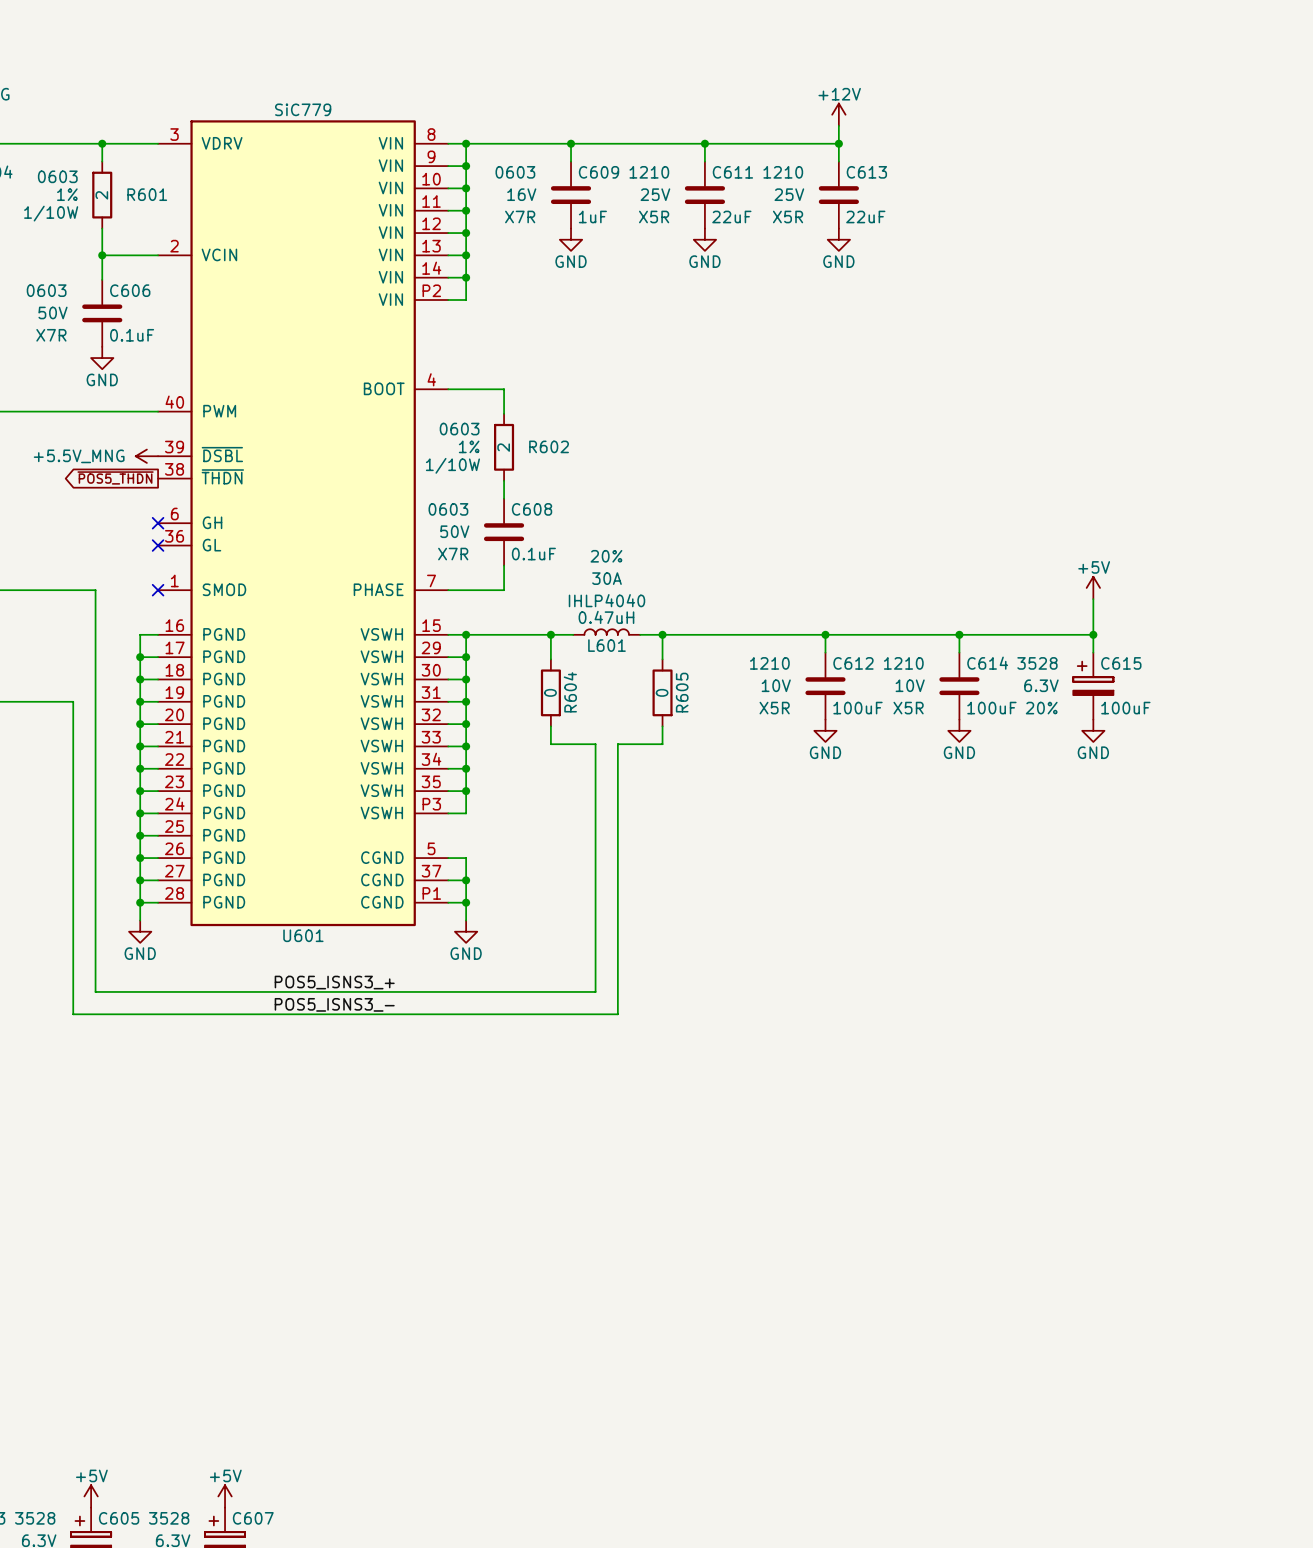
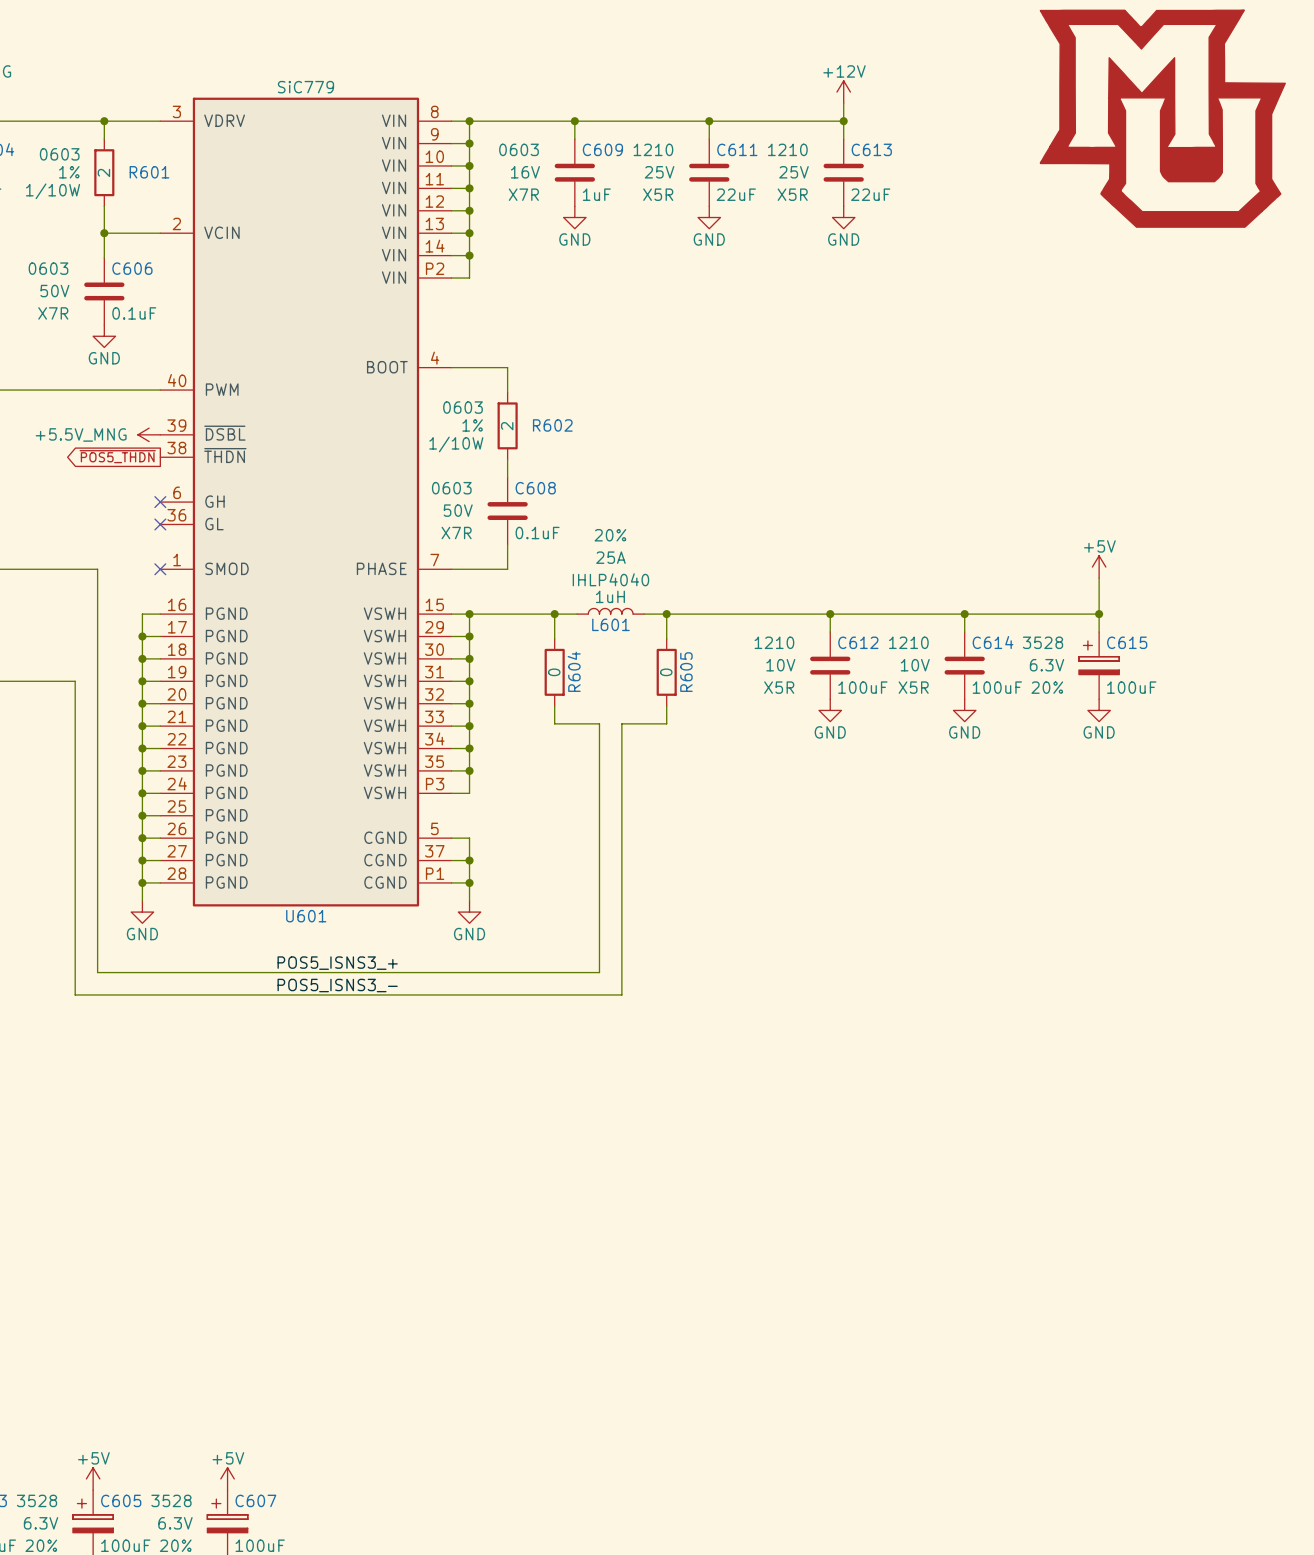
power symbol: none -> (1162, 118)
L601 text: 30A (606, 578) -> 25A (610, 557)
L601 value: 0.47uH (606, 617) -> 1uH (610, 596)

